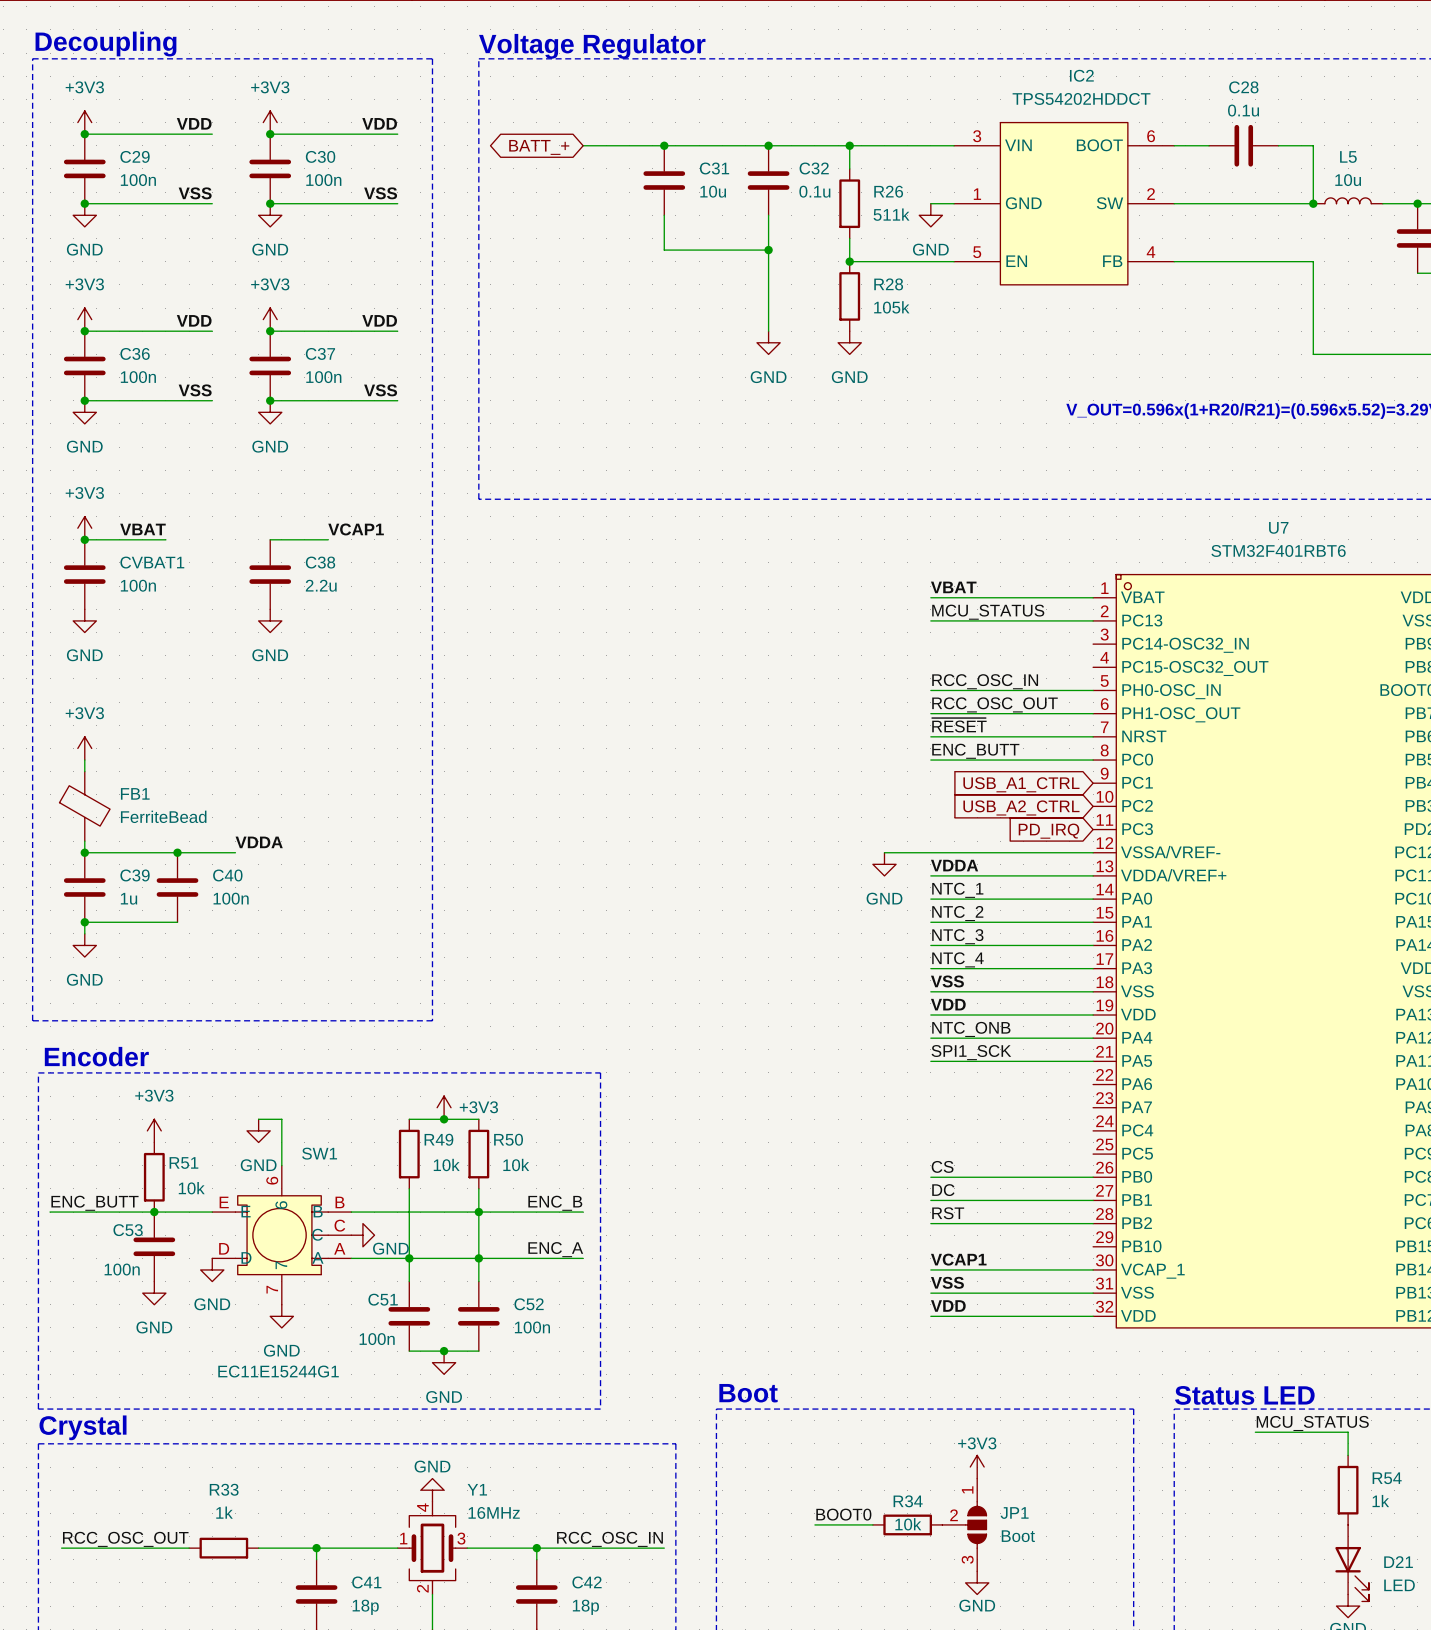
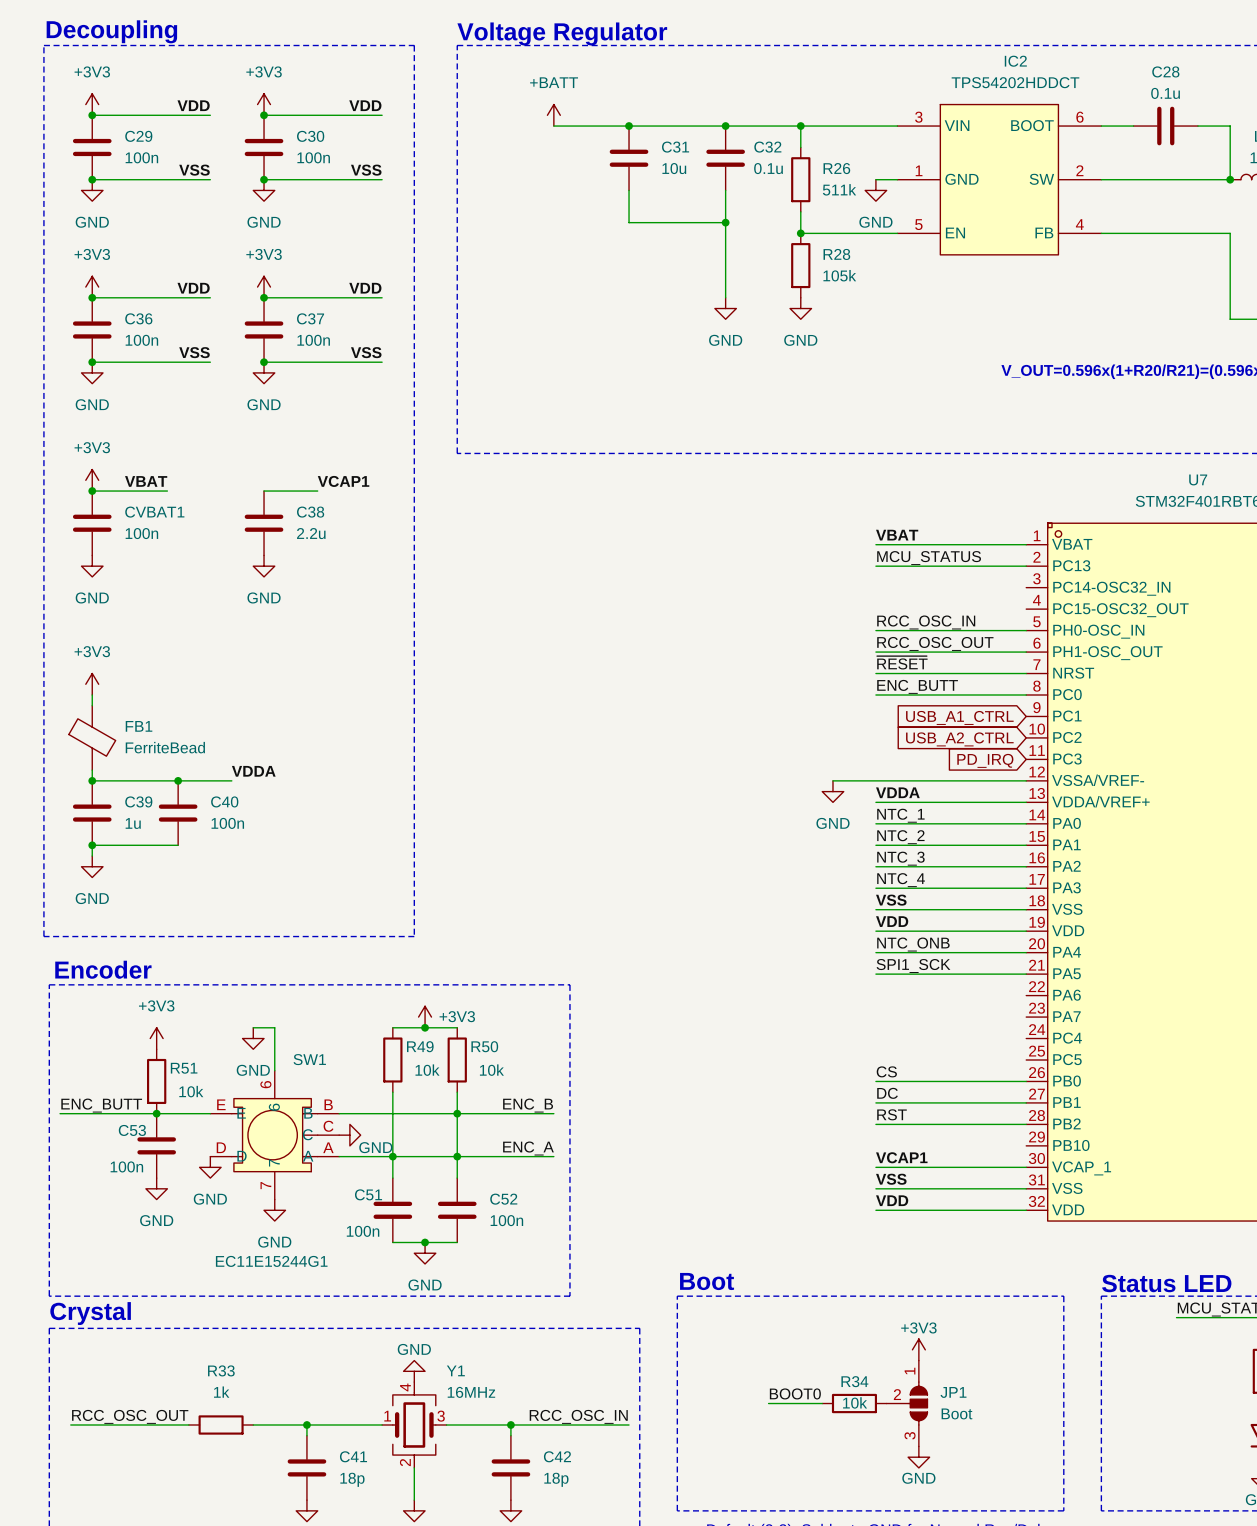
power symbol: none -> +BATT (553, 115)
global label: BATT_+ (539, 147) -> none

